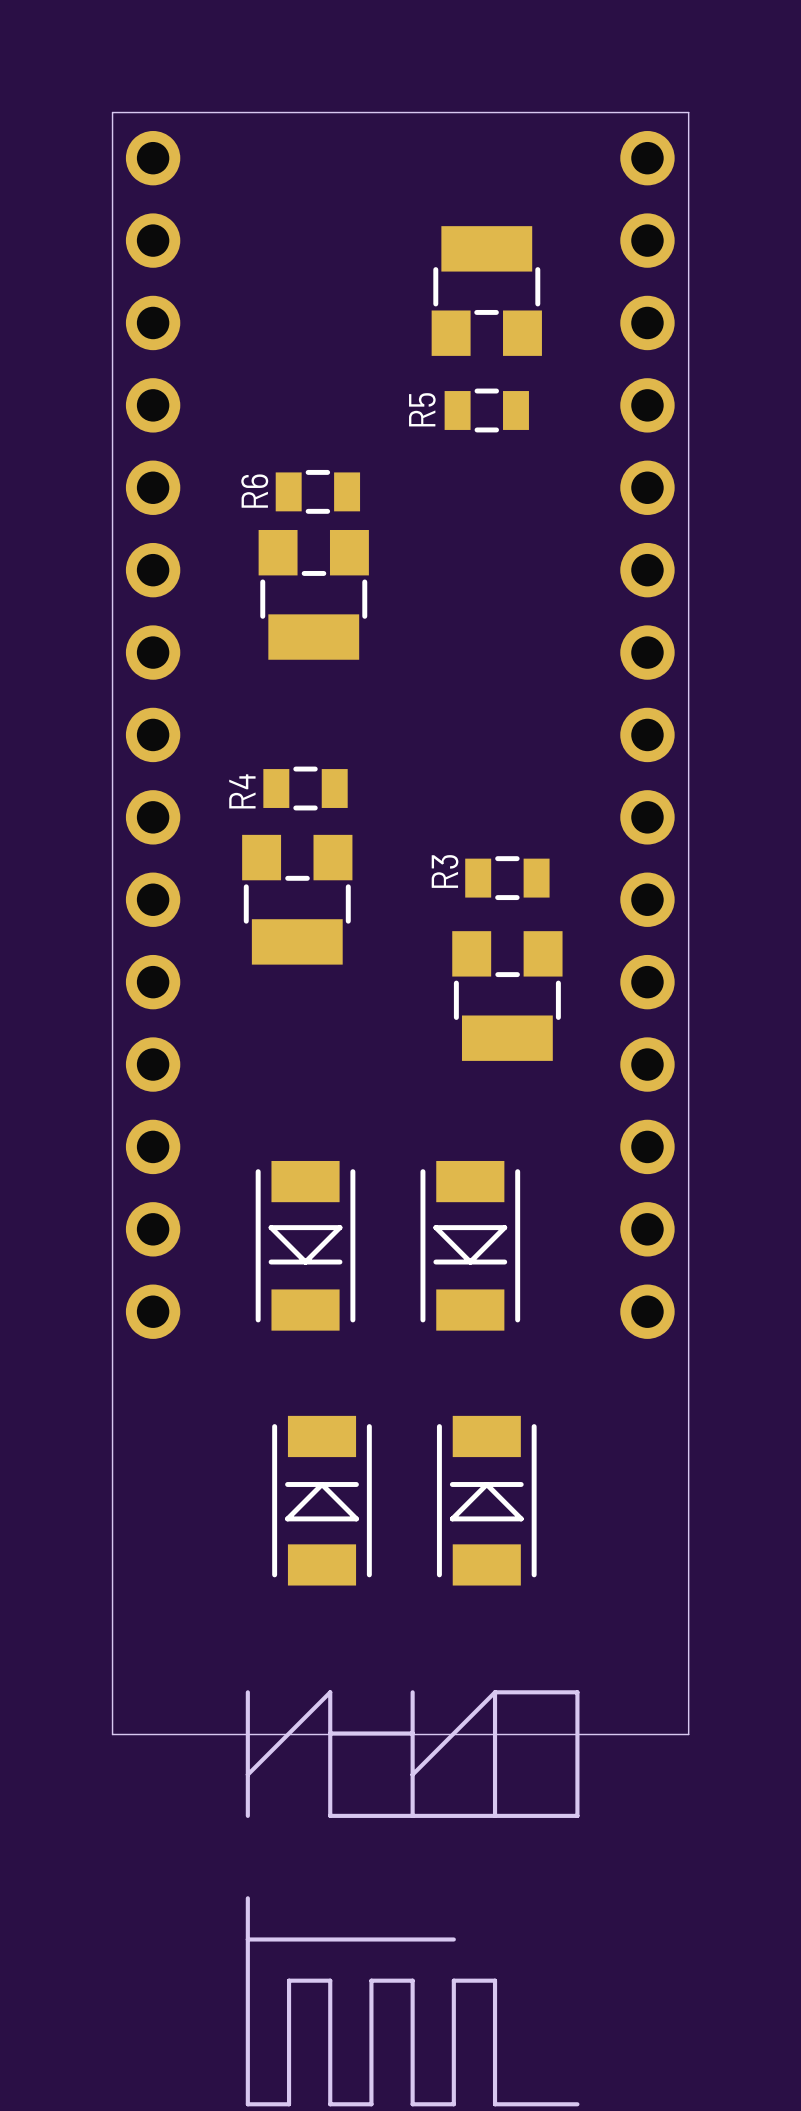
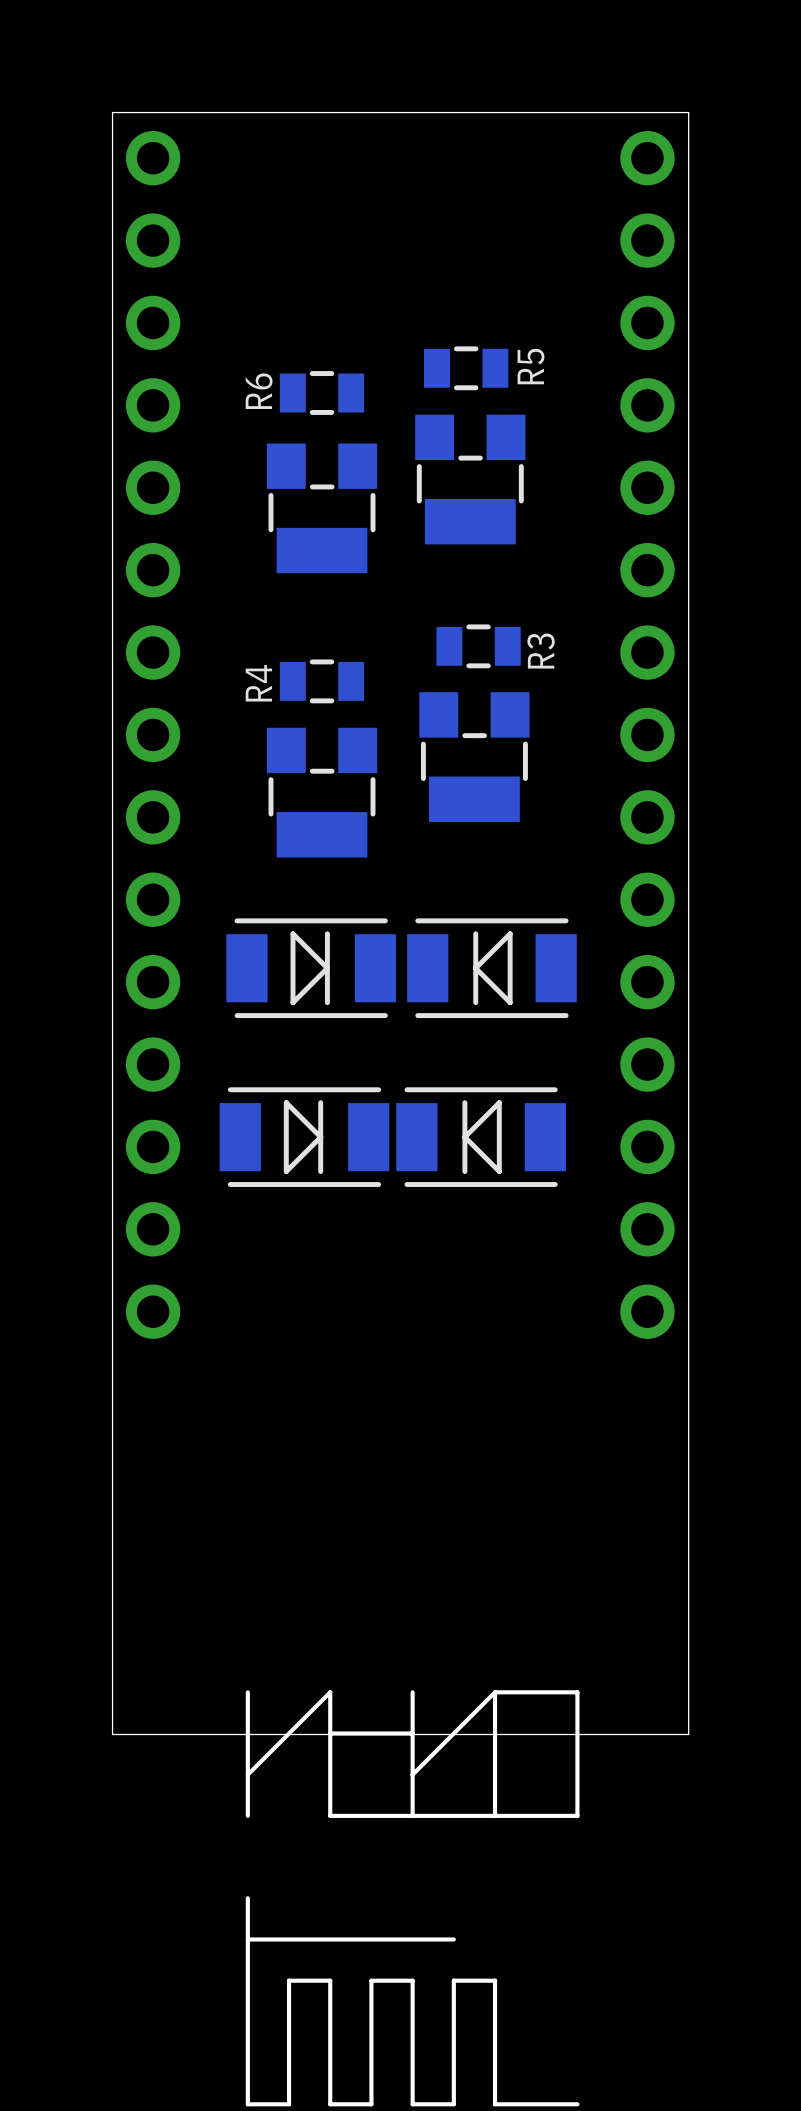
part: (486, 291) -> none
R5 name position: R5 (422, 409) -> R5 (531, 366)
R5 position: (486, 410) -> (466, 368)
part: none -> (470, 479)
R6 position: (317, 491) -> (322, 393)
part position: (313, 594) -> (322, 508)
part: none -> (474, 757)
R4 position: (305, 788) -> (322, 681)
part: none -> (322, 792)
R3 name position: R3 (445, 871) -> R3 (541, 651)
R3 position: (507, 878) -> (478, 646)
part: (297, 899) -> none
part footprint: [452, 931, 563, 1061] -> [407, 918, 577, 1019]
part: none -> (311, 968)
part: none -> (304, 1137)
part: none -> (481, 1137)
part: (305, 1245) -> none
part: (470, 1245) -> none
part: (322, 1500) -> none
part: (486, 1500) -> none

